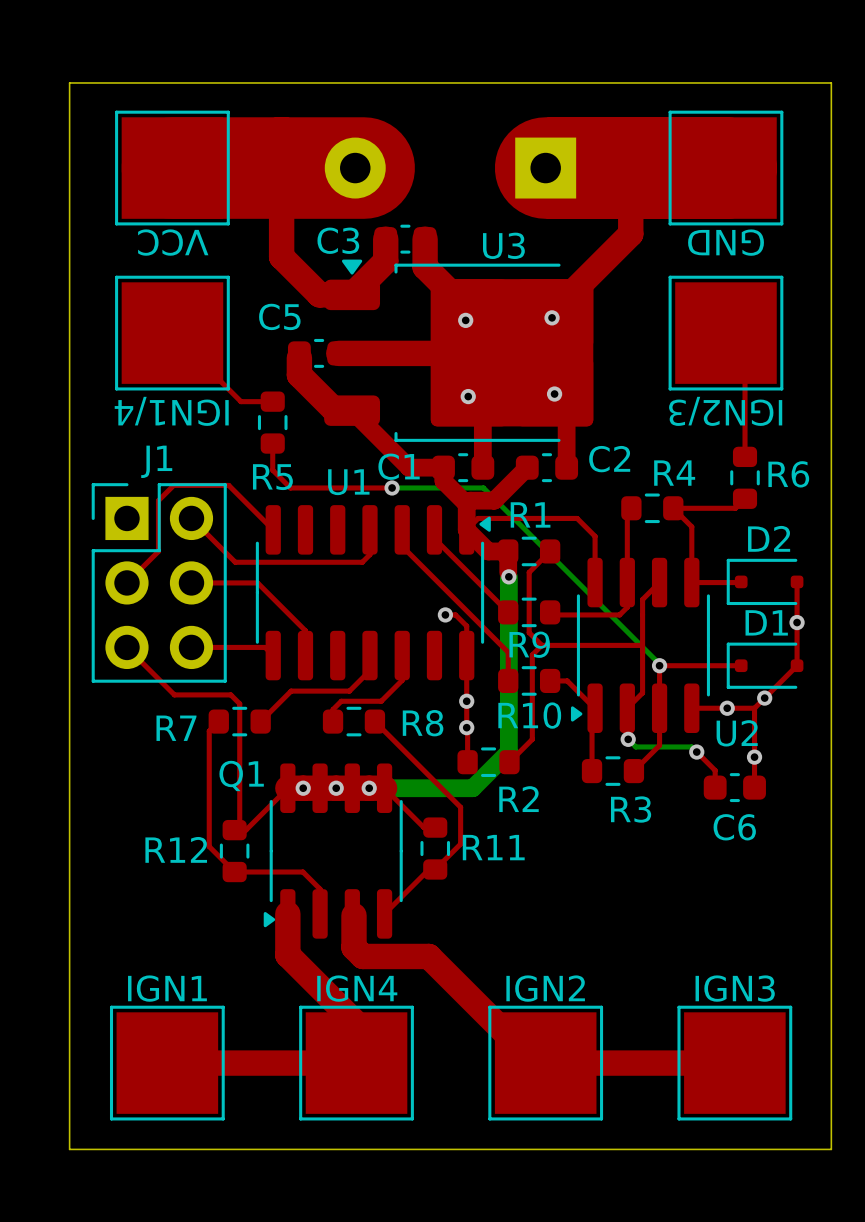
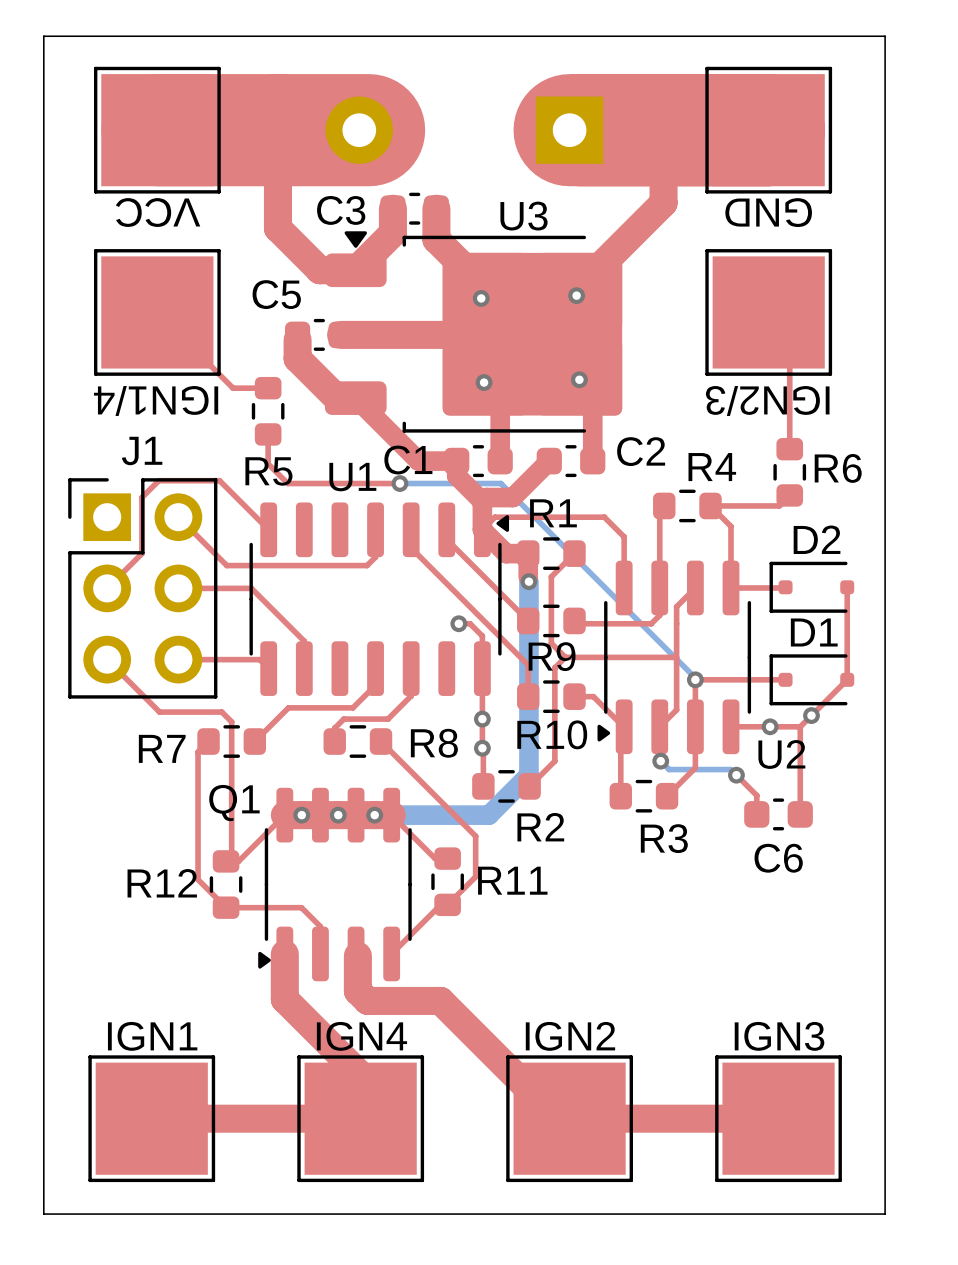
via: (797, 622) -> none
via: (754, 757) -> none

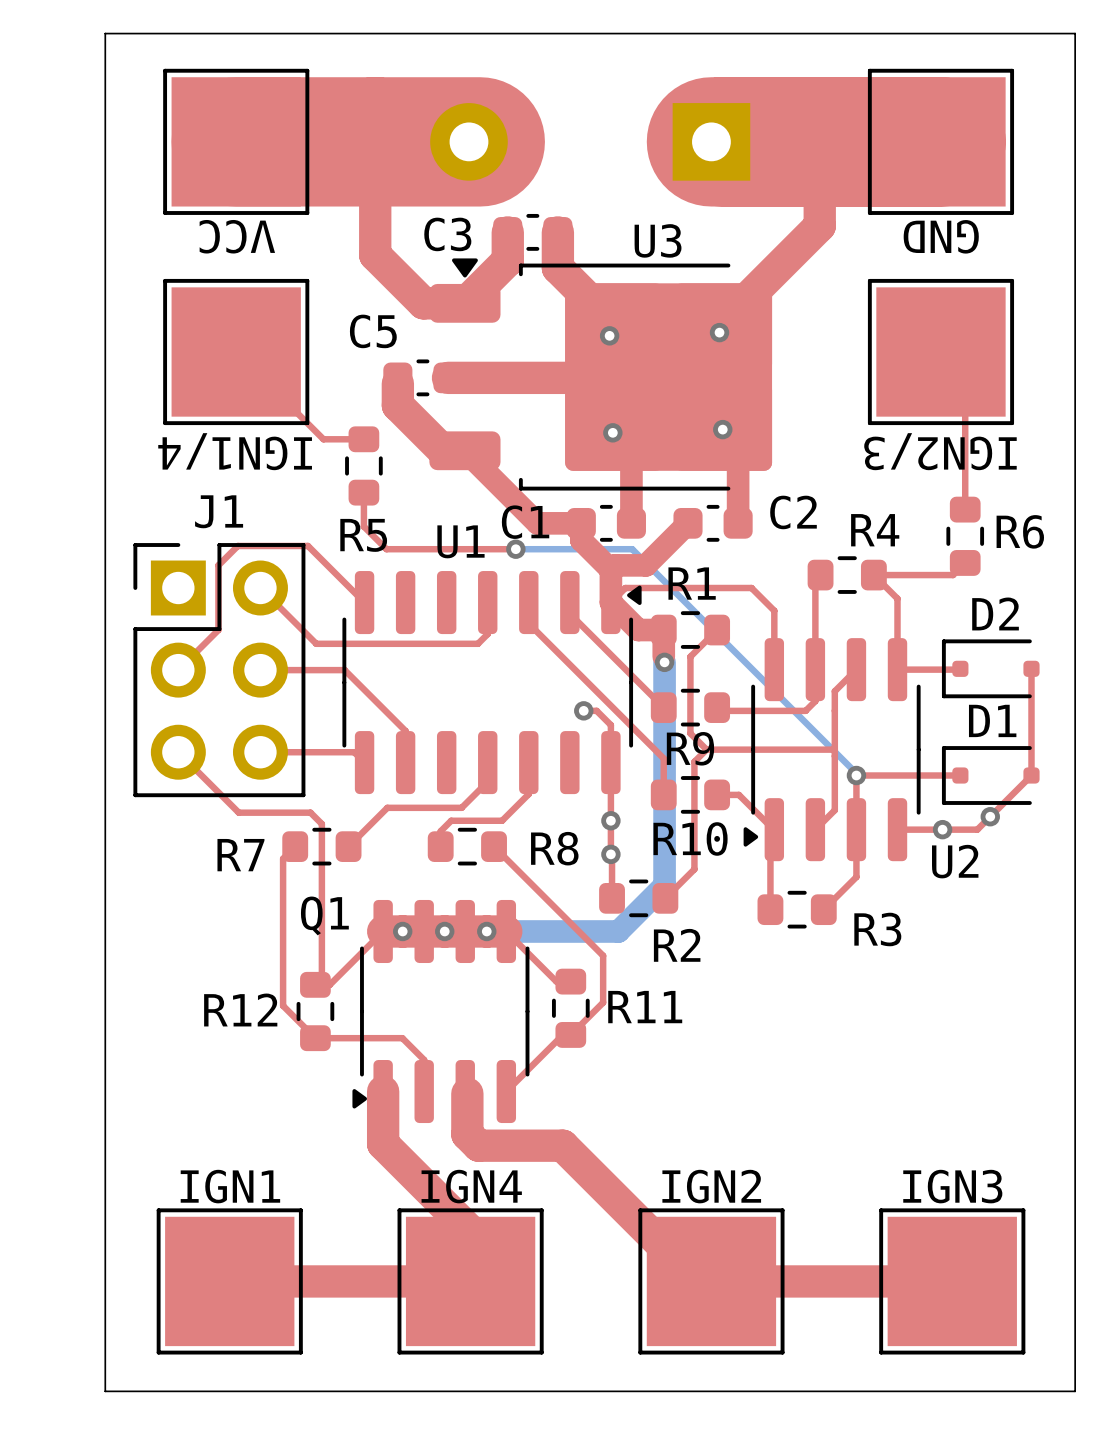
top track: (800, 726) (800, 814) -> none
bottom track: (660, 761) (669, 769) (730, 769) (736, 775) -> none
via: (660, 761) -> none
top track: (736, 775) (756, 795) (756, 814) -> none
via: (736, 775) -> none
C6: (778, 814) -> none
R3 name position: R3 (664, 838) -> R3 (877, 929)

